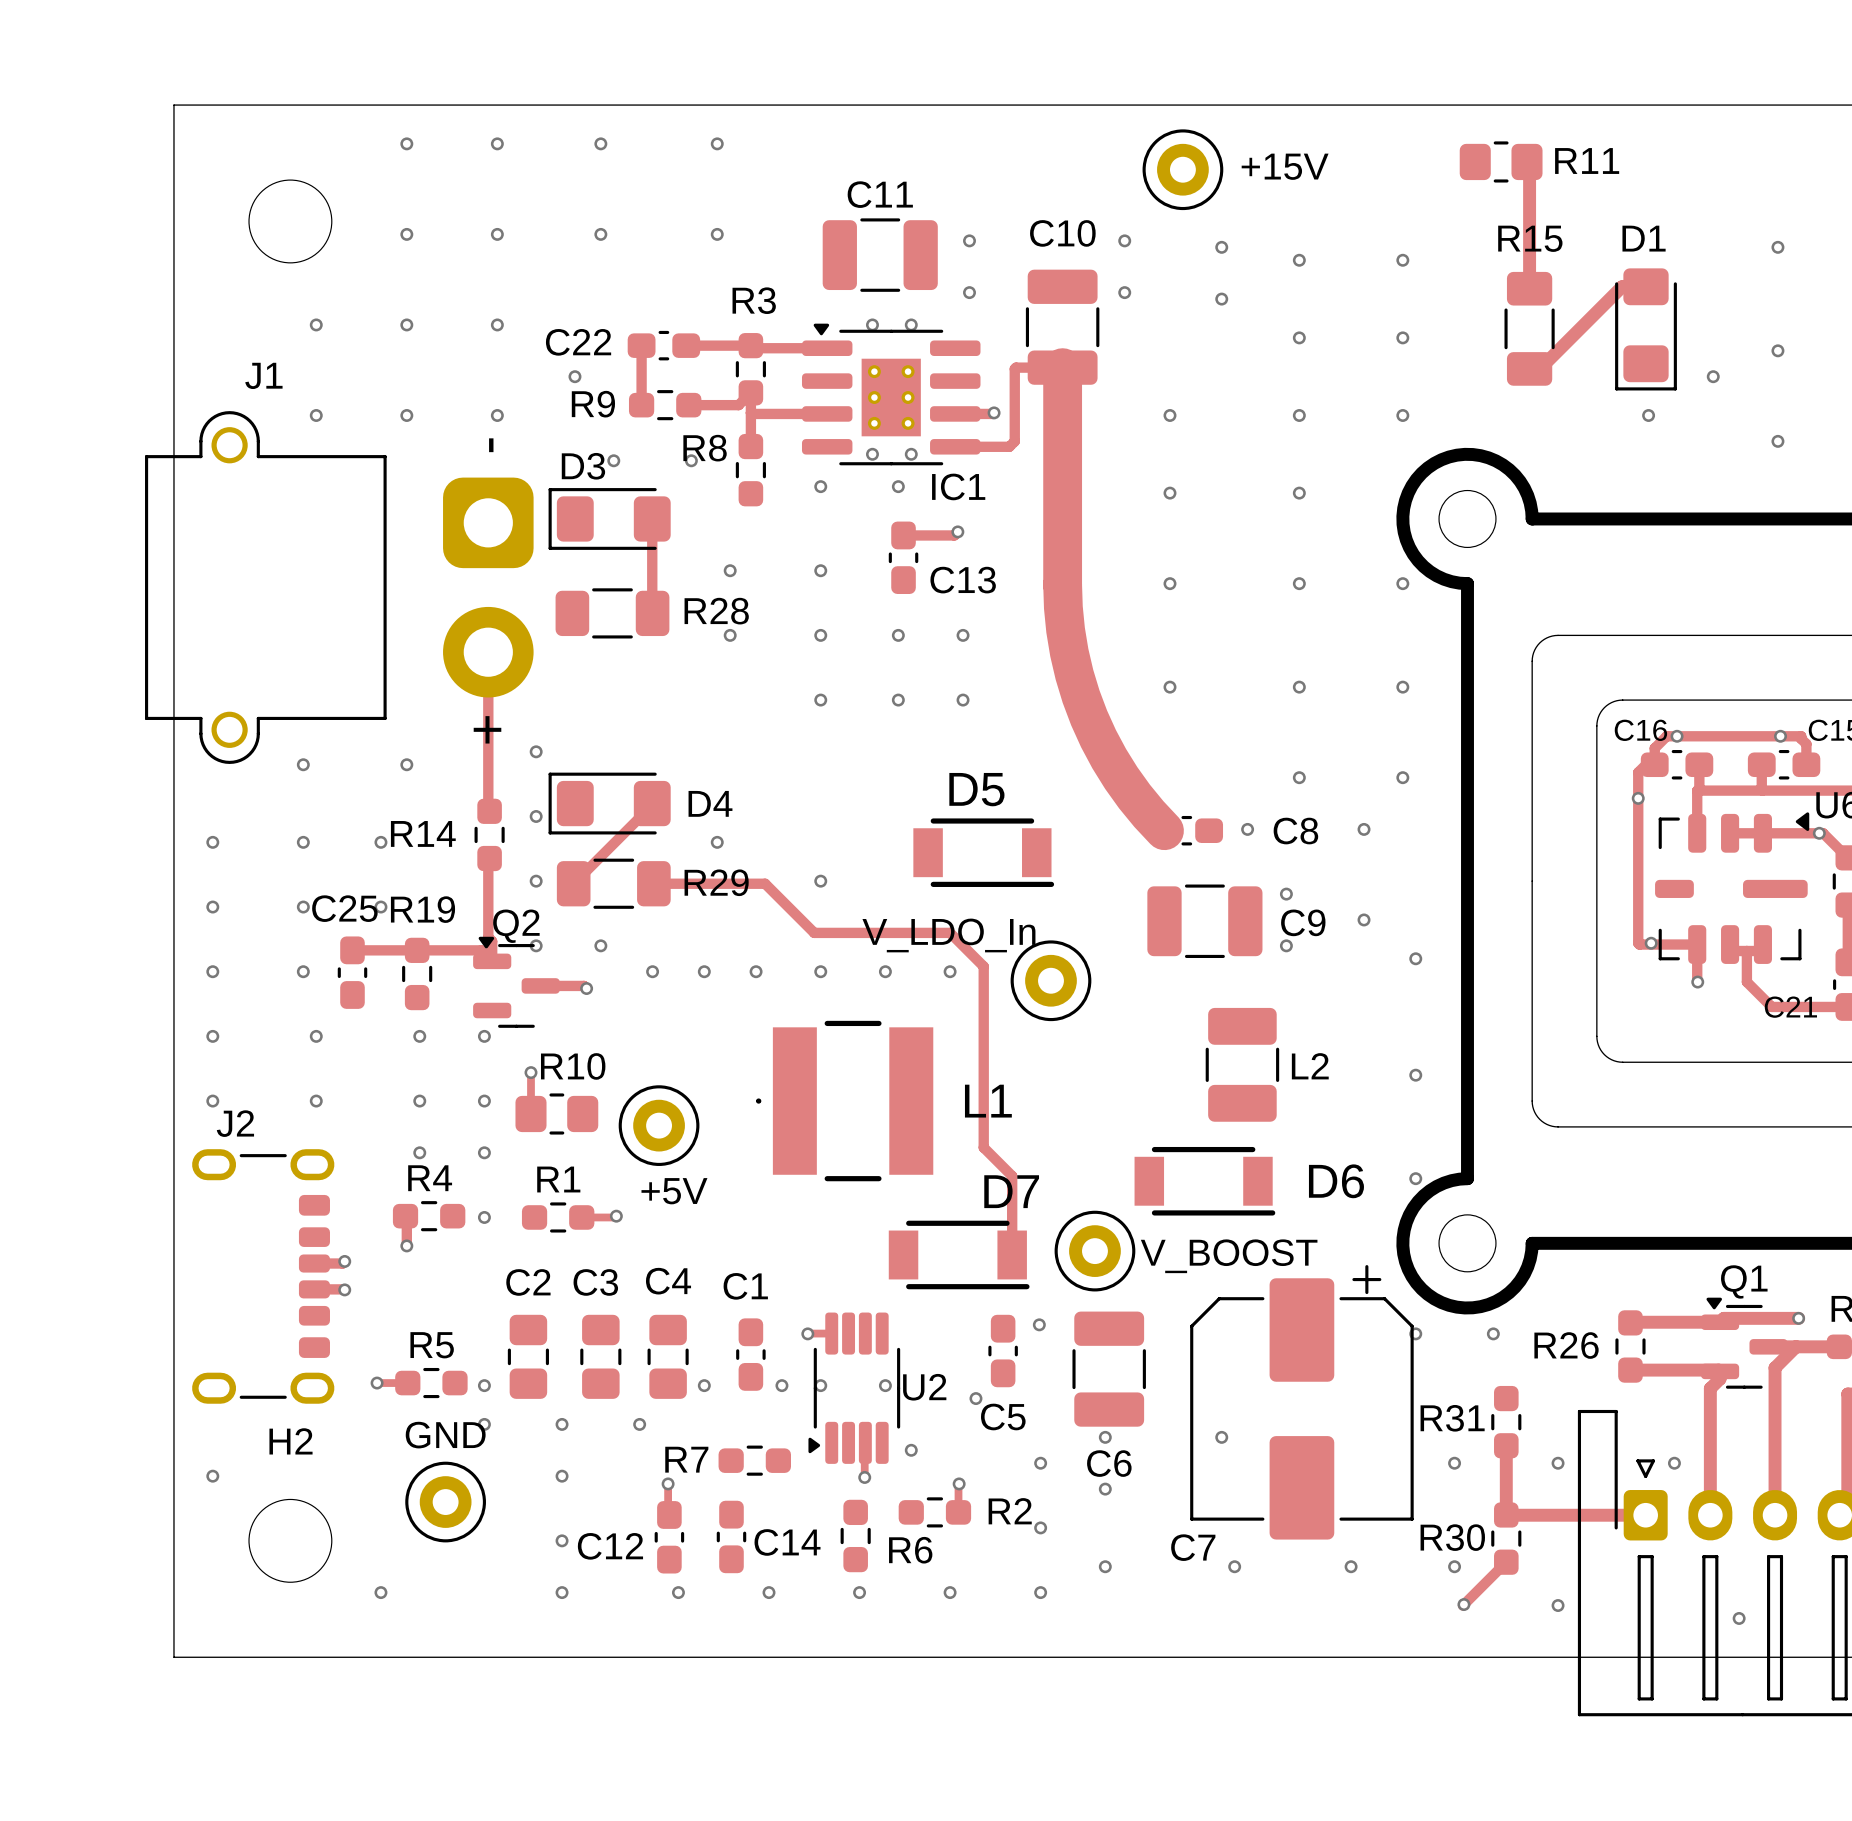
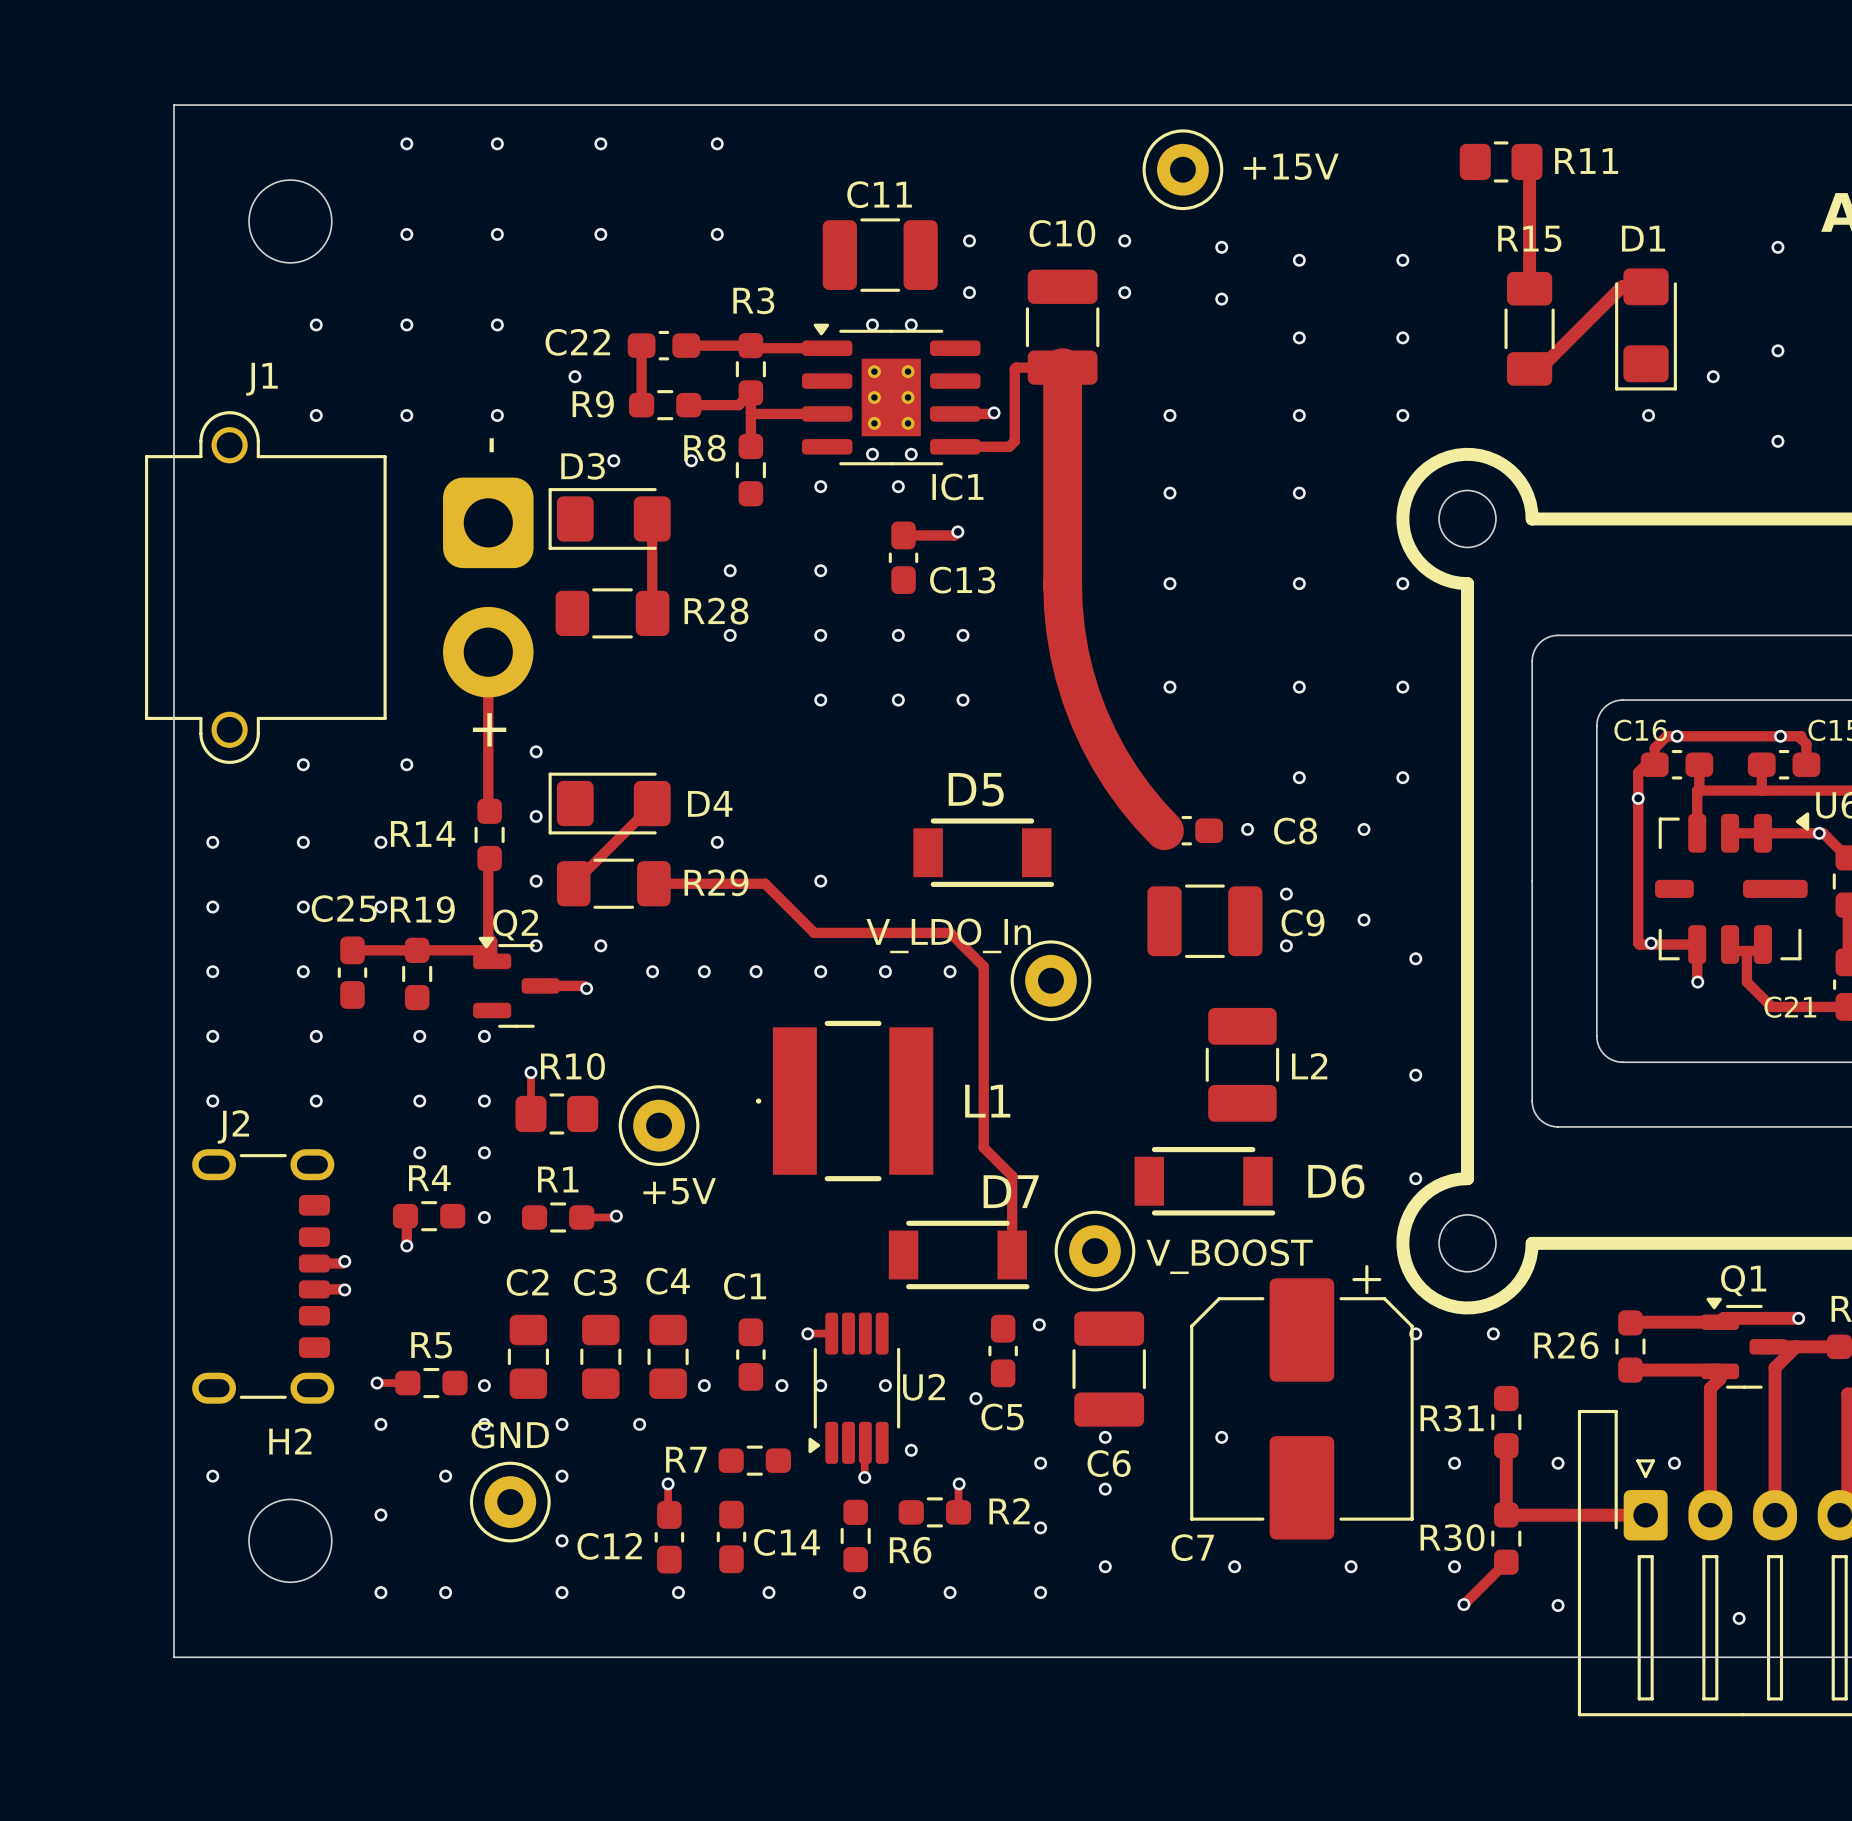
via: none -> (380, 1424)
via: none -> (445, 1476)
part position: (445, 1502) -> (510, 1502)
via: none -> (380, 1514)
via: none -> (445, 1592)

